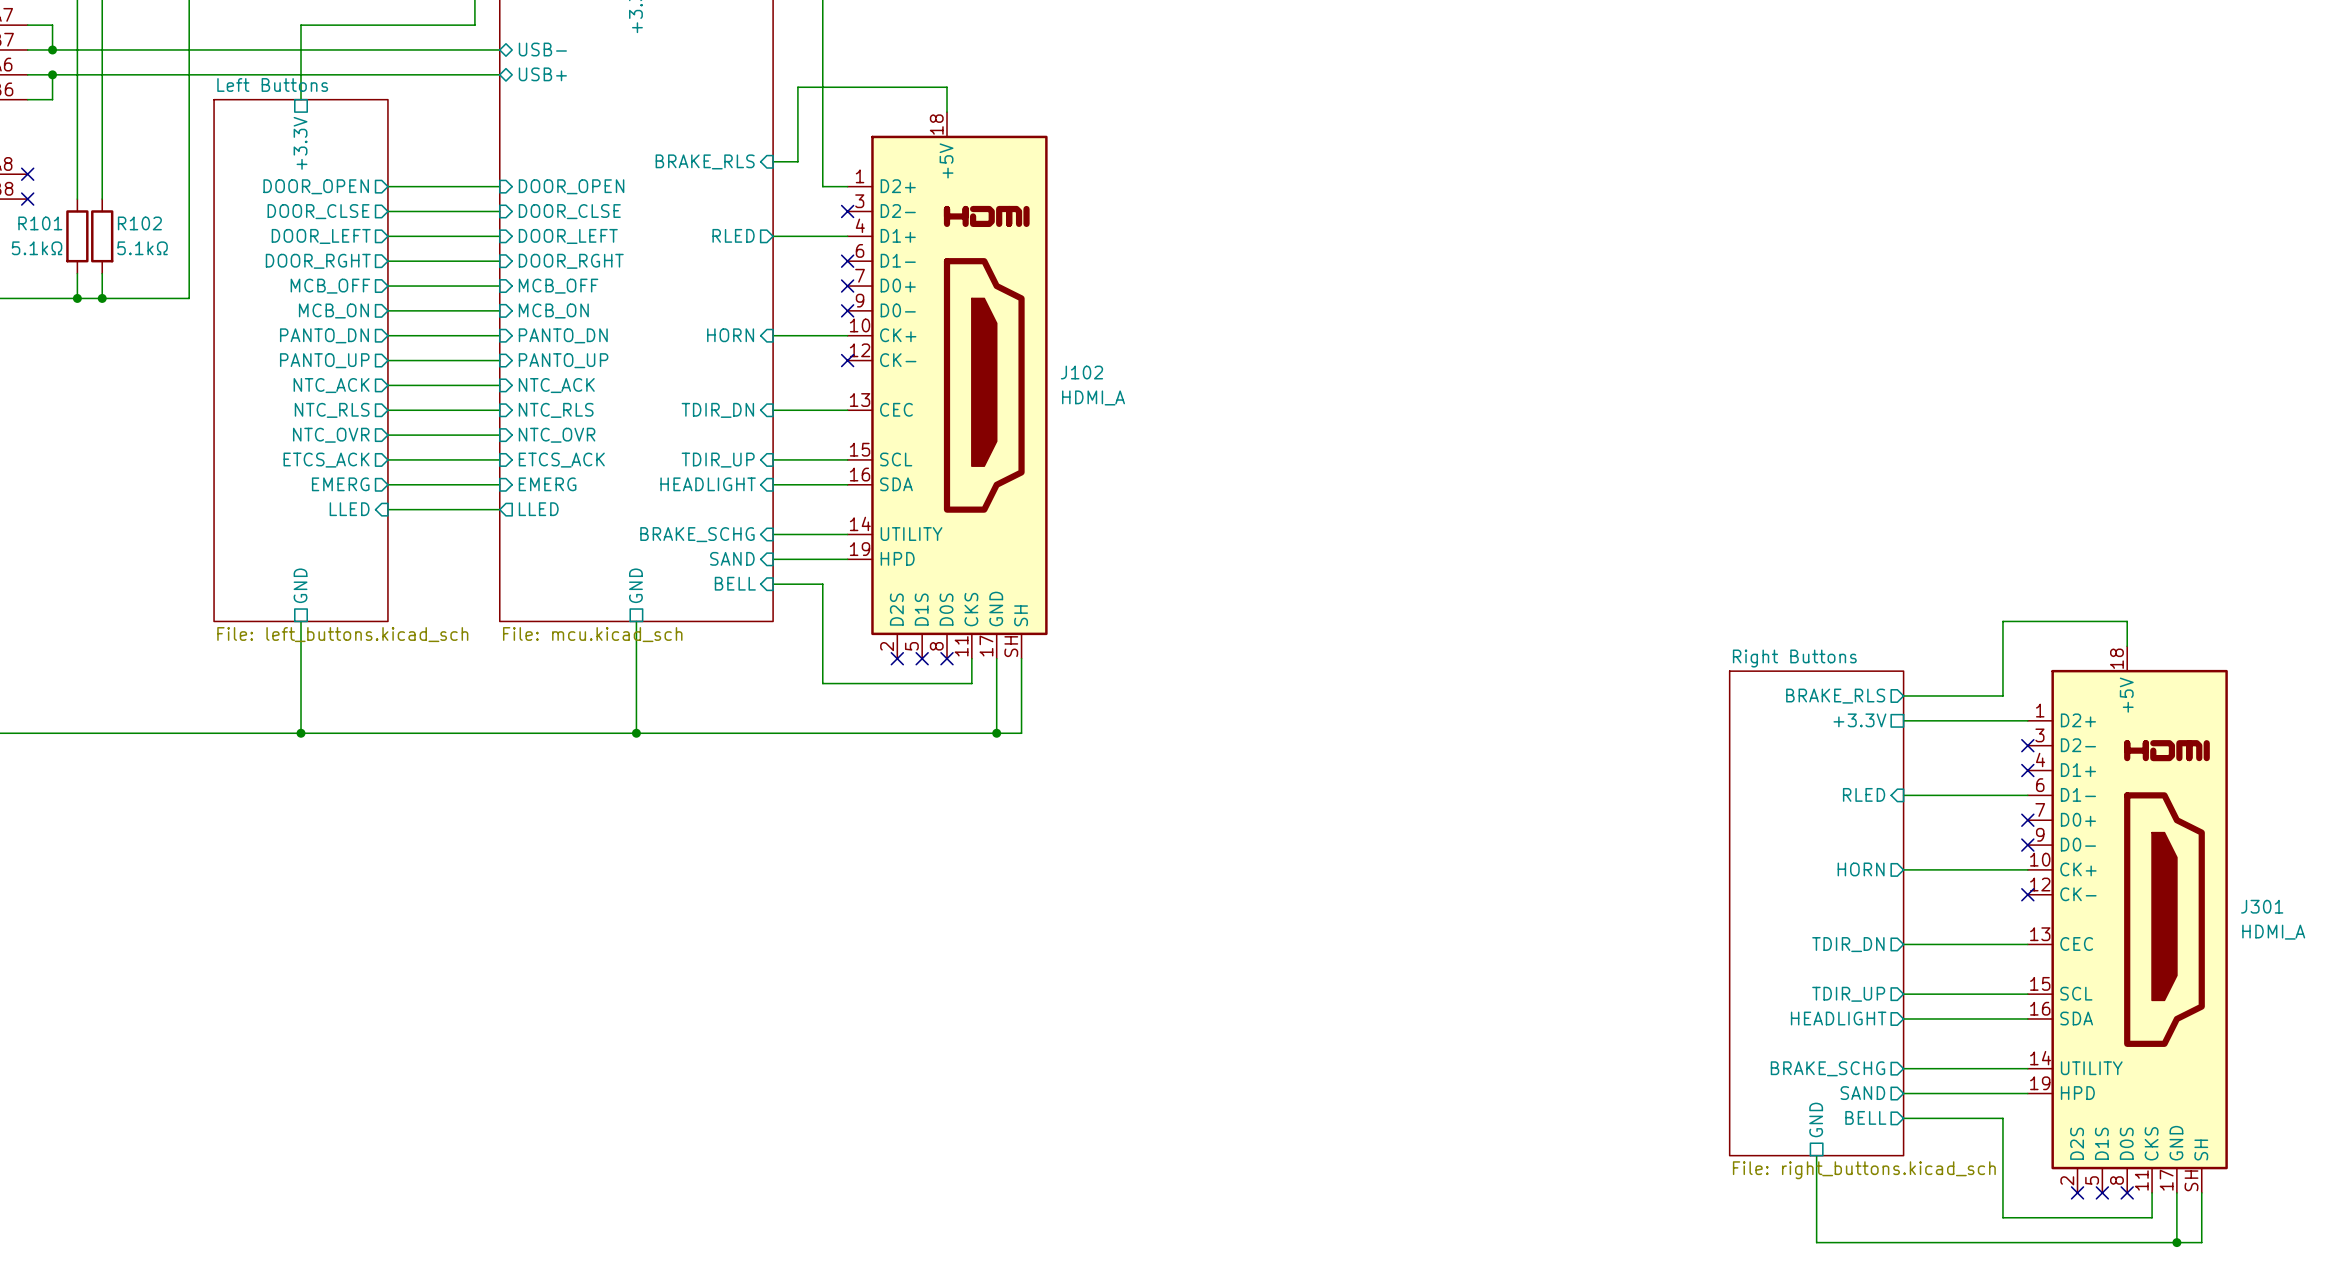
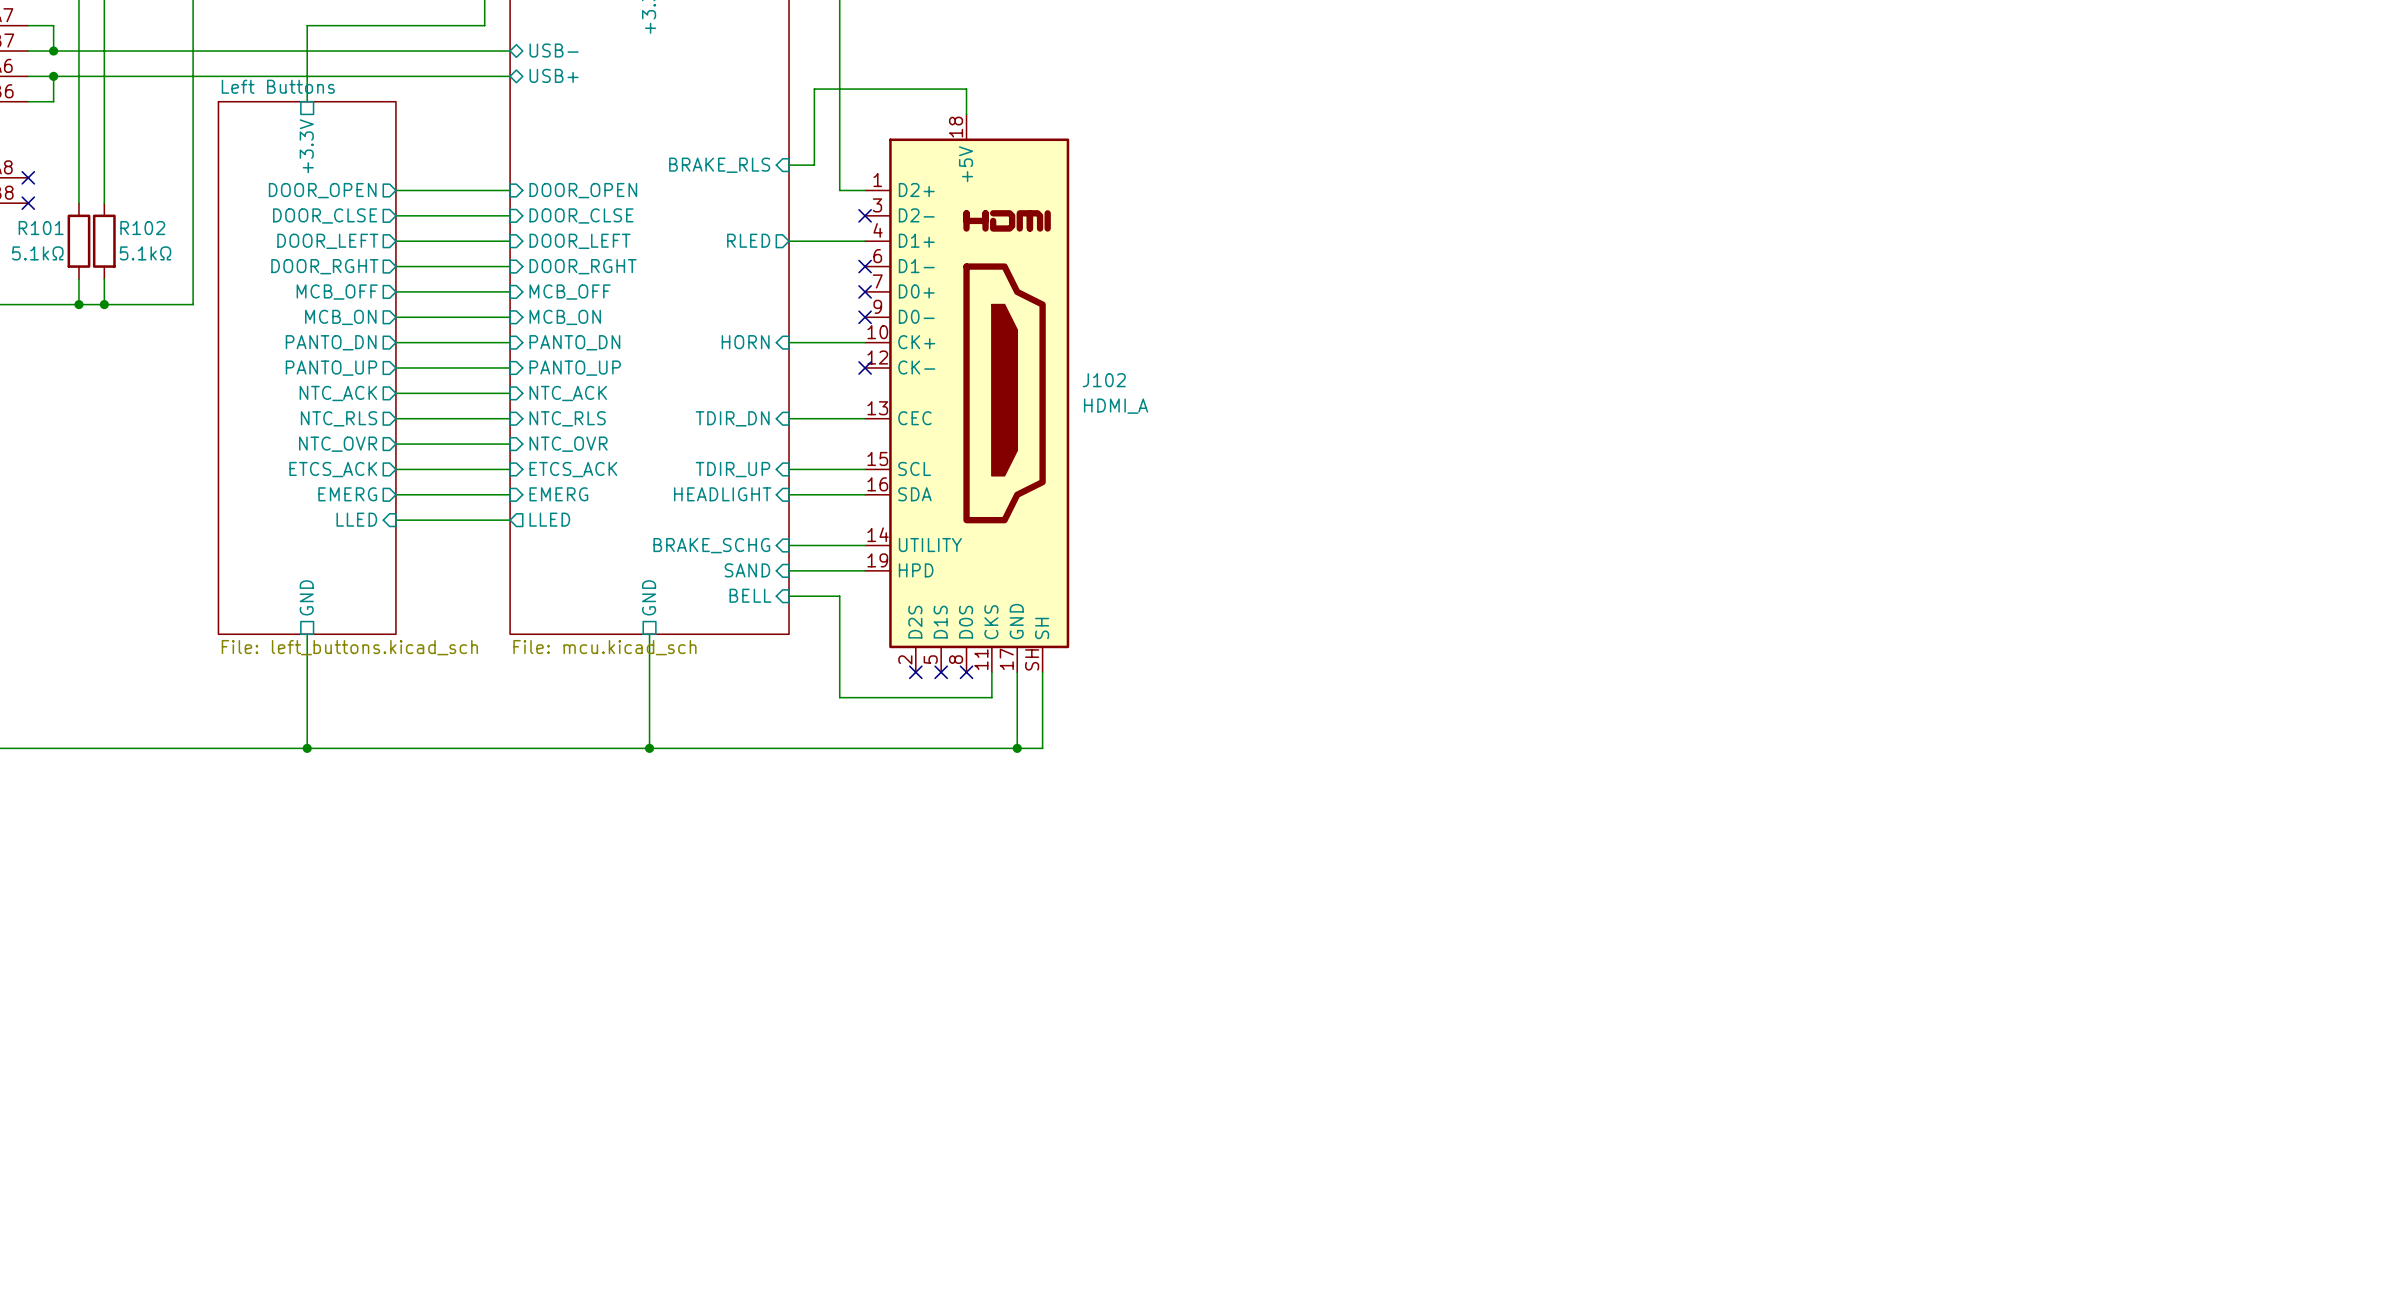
wire: (2127, 646) (2127, 621) (2002, 621) (2002, 695) (1903, 695) -> none
sheet pin: BRAKE_RLS (1835, 696) -> none
sheet pin: +3.3V (1859, 720) -> none
wire: (1903, 720) (2027, 720) -> none
no-connect mark: (2027, 745) -> none
no-connect mark: (2027, 770) -> none
sheet pin: RLED (1864, 794) -> none
wire: (1903, 795) (2027, 795) -> none
no-connect mark: (2027, 820) -> none
no-connect mark: (2027, 845) -> none
sheet pin: HORN (1861, 869) -> none
wire: (1903, 869) (2027, 869) -> none
no-connect mark: (2027, 894) -> none
sheet Right Buttons: File: right_buttons.kicad_sch (1816, 913) -> none
J301: HDMI_A (2127, 919) -> none
sheet pin: TDIR_DN (1848, 944) -> none
wire: (1903, 944) (2027, 944) -> none
sheet pin: TDIR_UP (1848, 994) -> none
wire: (1903, 994) (2027, 994) -> none
sheet pin: HEADLIGHT (1838, 1018) -> none
wire: (1903, 1018) (2027, 1018) -> none
sheet pin: BRAKE_SCHG (1827, 1068) -> none
wire: (1903, 1068) (2027, 1068) -> none
sheet pin: SAND (1862, 1093) -> none
wire: (1903, 1093) (2027, 1093) -> none
sheet pin: BELL (1865, 1117) -> none
wire: (1903, 1118) (2002, 1118) (2002, 1217) (2152, 1217) (2152, 1192) -> none
sheet pin: GND (1816, 1119) -> none
wire: (1816, 1155) (1816, 1242) (2201, 1242) (2201, 1192) -> none
no-connect mark: (2077, 1192) -> none
no-connect mark: (2102, 1192) -> none
no-connect mark: (2127, 1192) -> none
wire: (2176, 1192) (2176, 1242) -> none
junction: (2176, 1242) -> none

